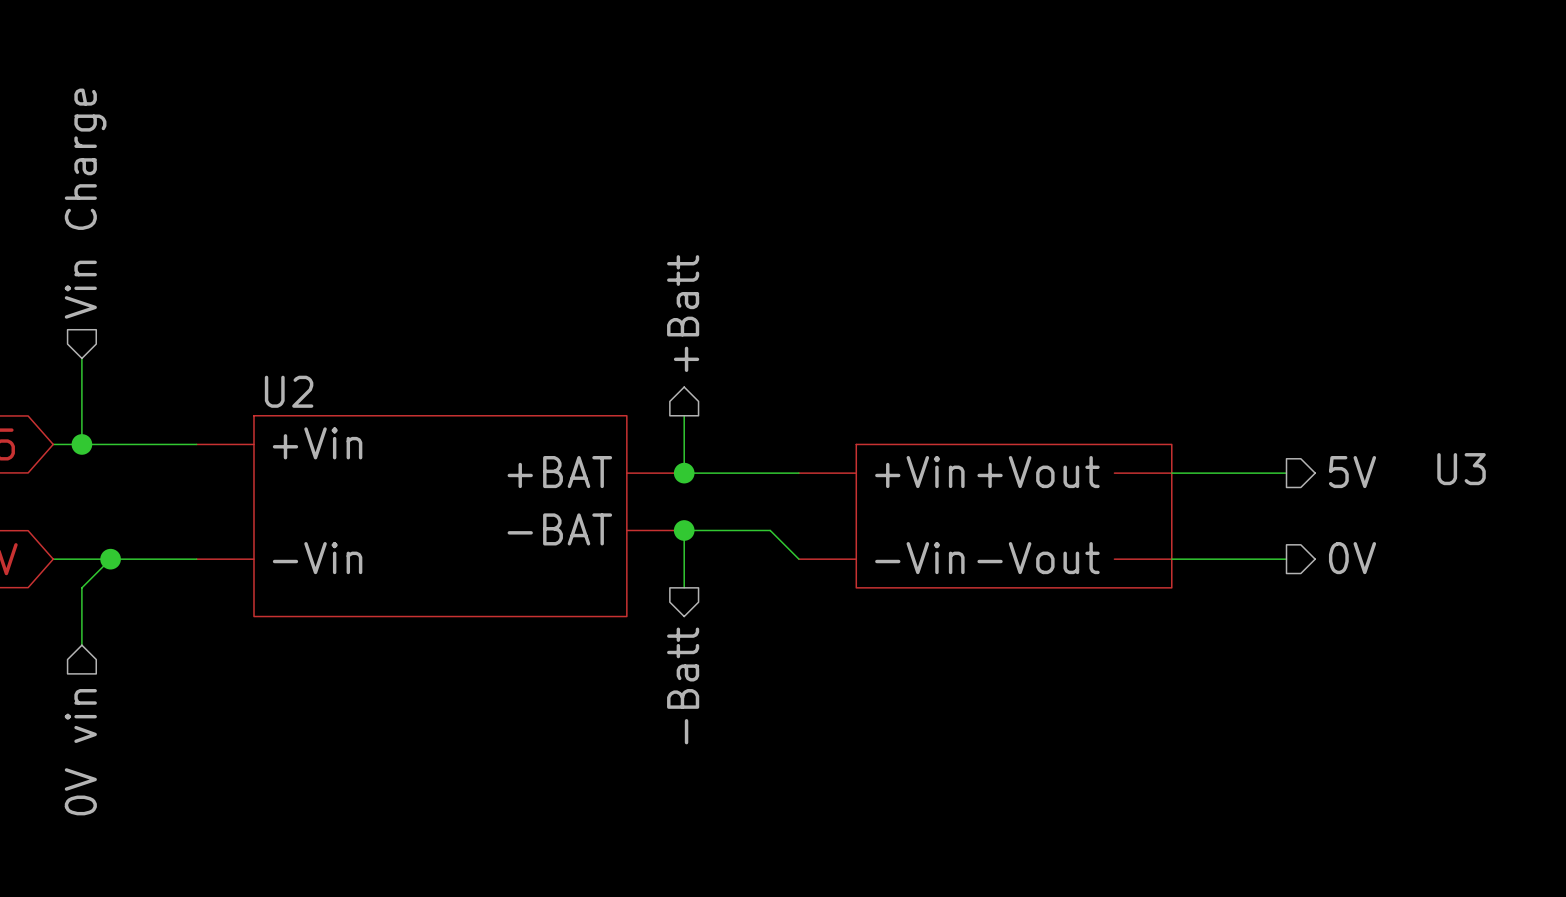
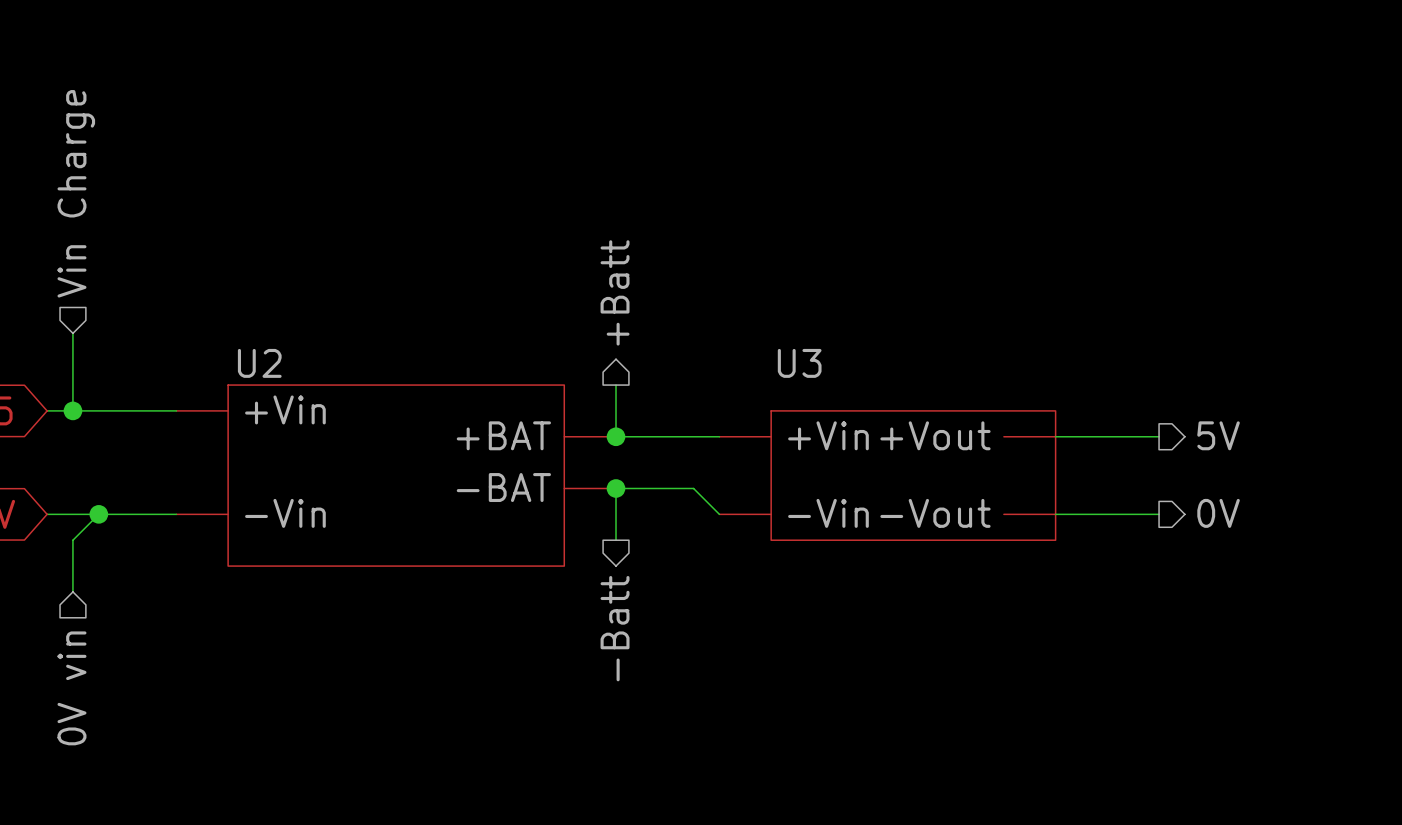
U3 name position: U3 (1461, 469) -> U3 (799, 363)

